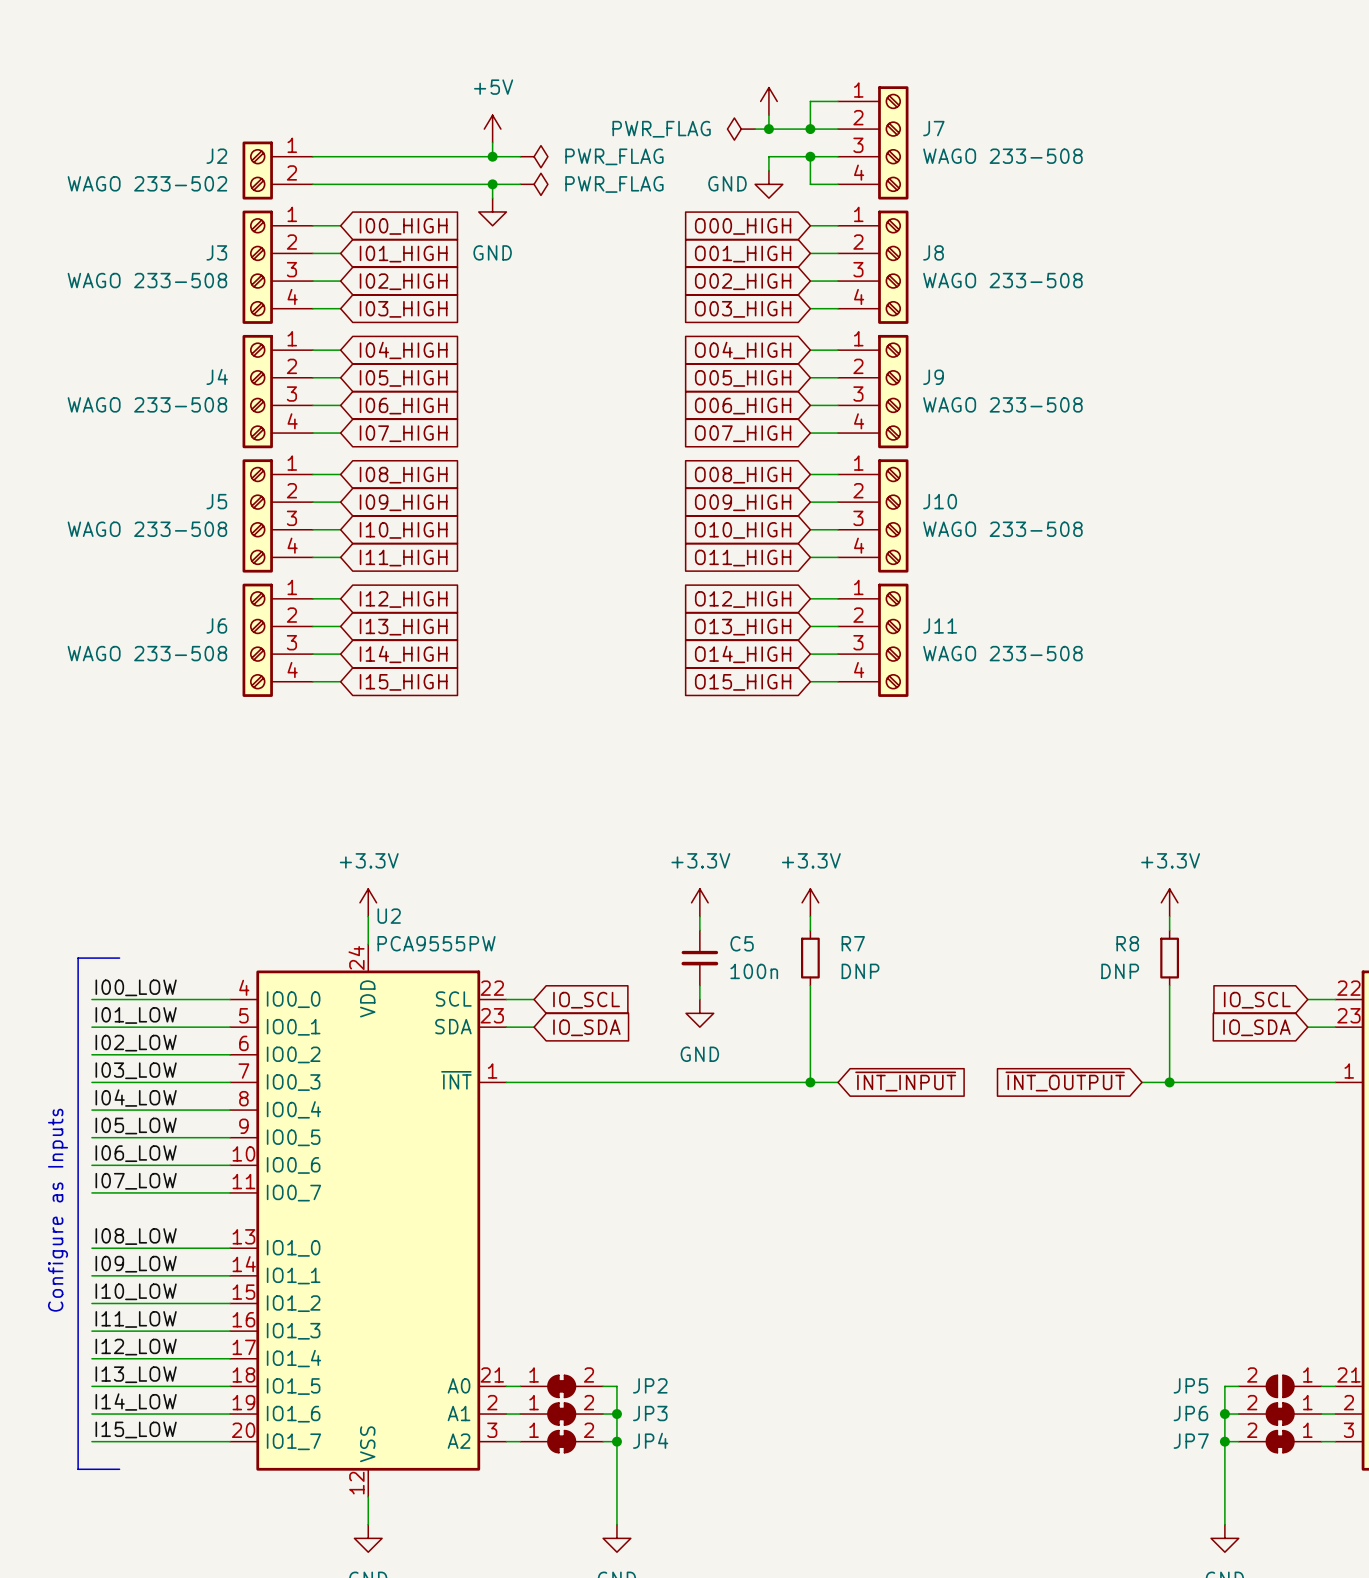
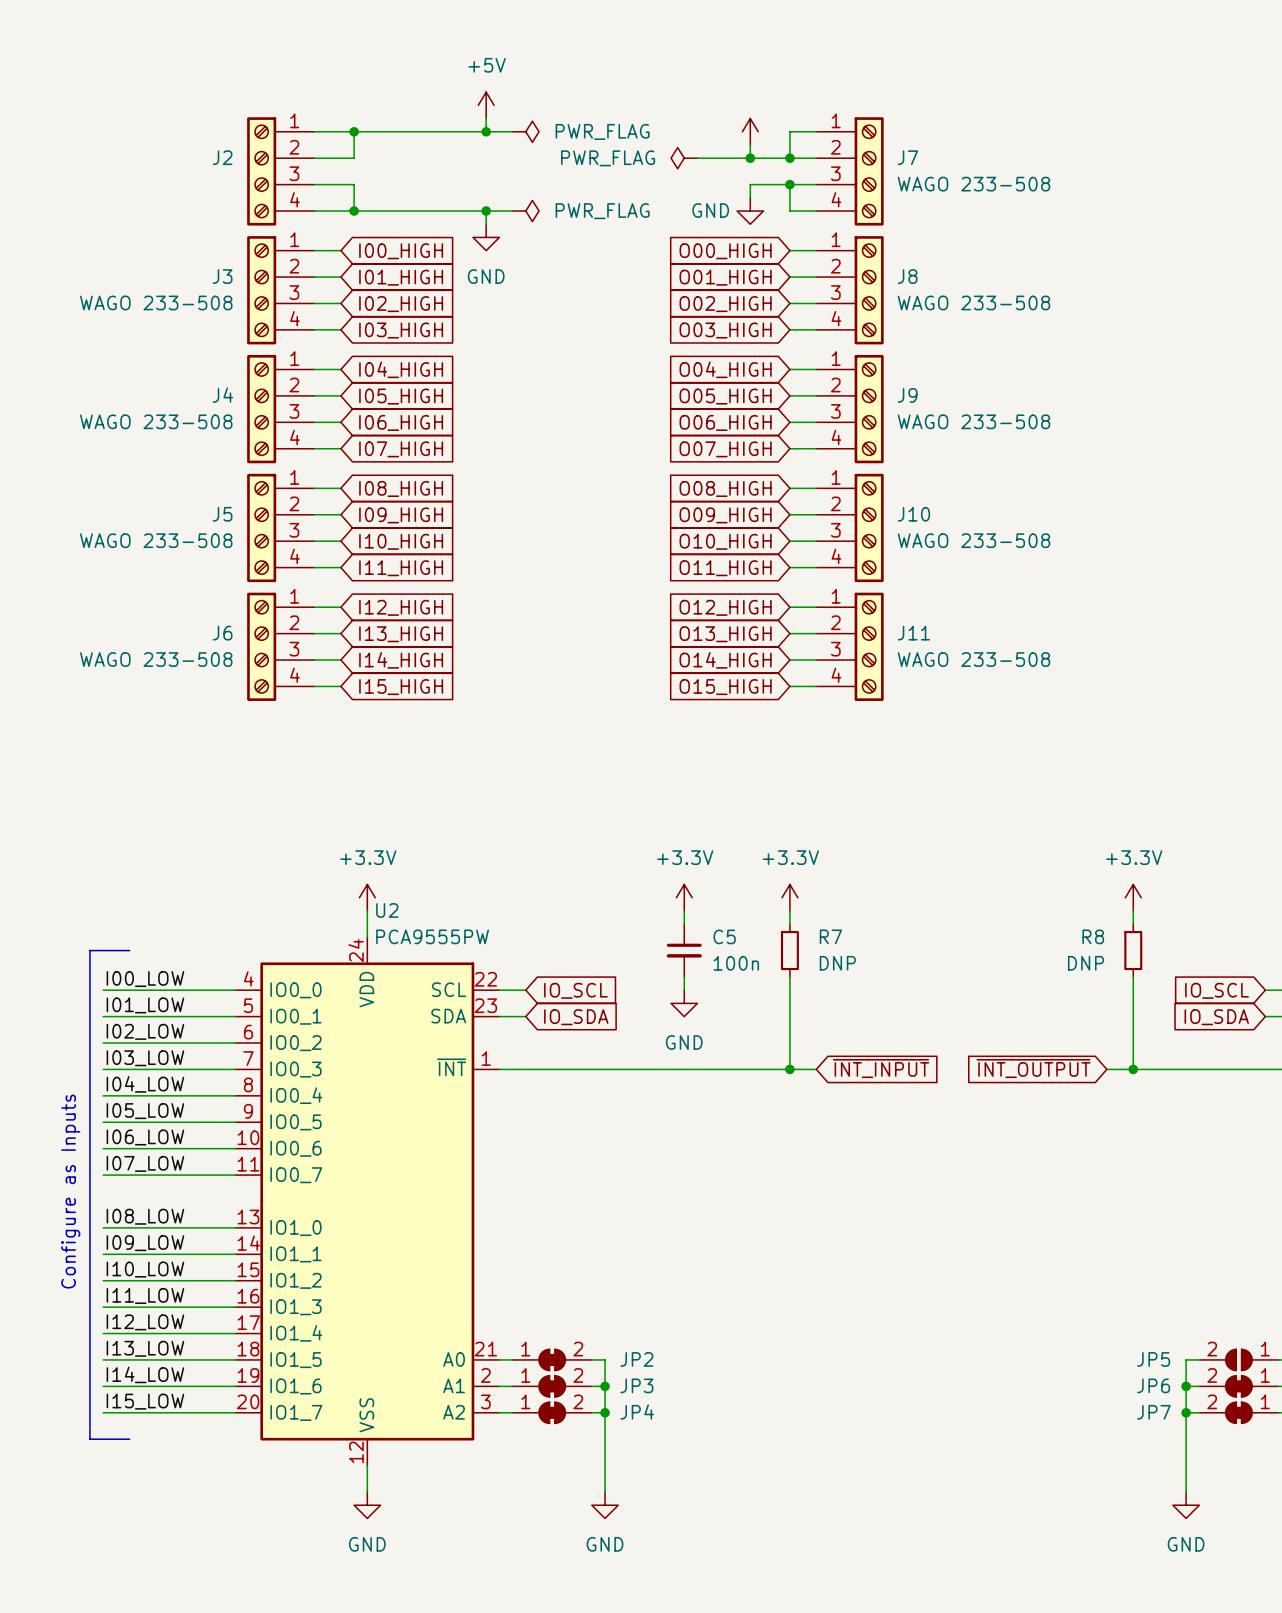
wire: none -> (314, 131) (512, 131)
wire: none -> (354, 131) (354, 158) (314, 158)
junction: none -> (354, 131)
power symbol position: +5V (492, 129) -> +5V (486, 105)
wire: none -> (697, 158) (737, 158)
power symbol position: PWR_FLAG (741, 129) -> PWR_FLAG (684, 158)
J2 symbol: [242, 141, 313, 200] -> [247, 117, 315, 226]
wire: (492, 142) (492, 156) -> (486, 118) (486, 131)
wire: (354, 156) (520, 156) -> (354, 184) (354, 211)
junction position: (492, 156) -> (486, 131)
power symbol position: PWR_FLAG (534, 156) -> PWR_FLAG (525, 131)
J2 value: WAGO 233-502 (147, 183) -> none
junction: none -> (354, 211)

